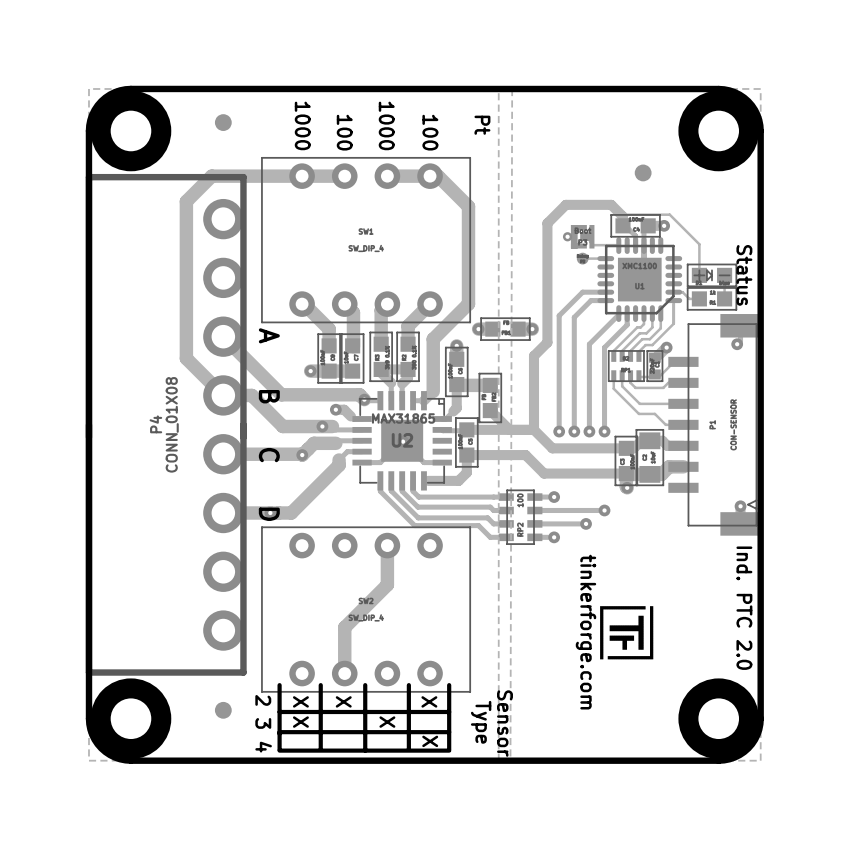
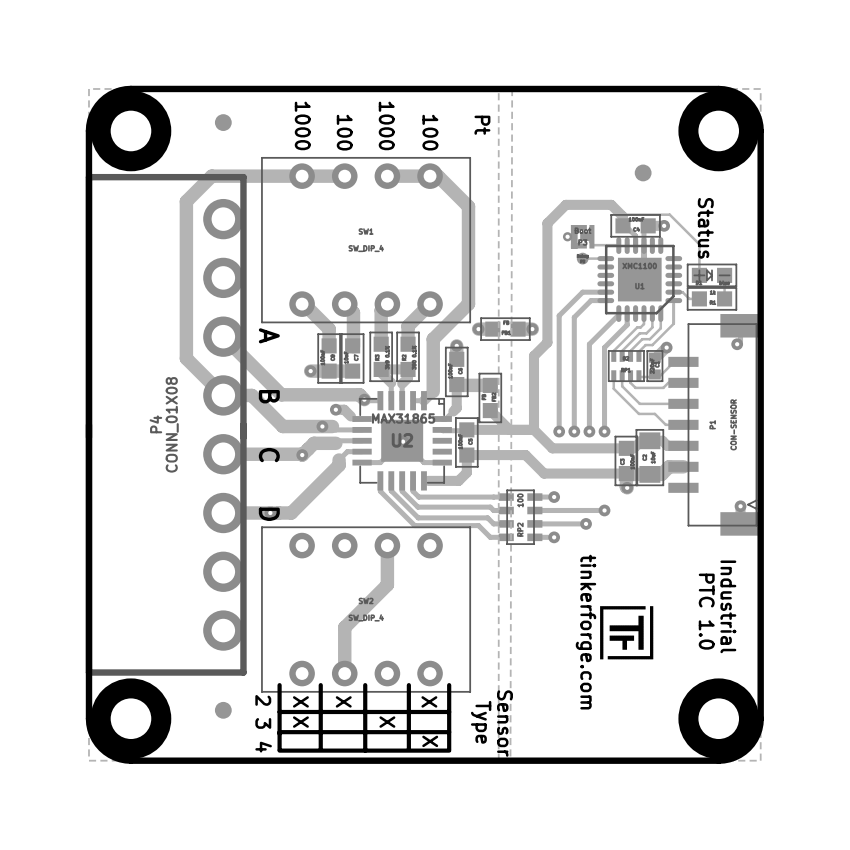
text position: Status (744, 275) -> Status (705, 228)
text: Ind. PTC 2.0 (744, 608) -> Industrial (728, 606)
text: none -> PTC 1.0 (706, 611)

